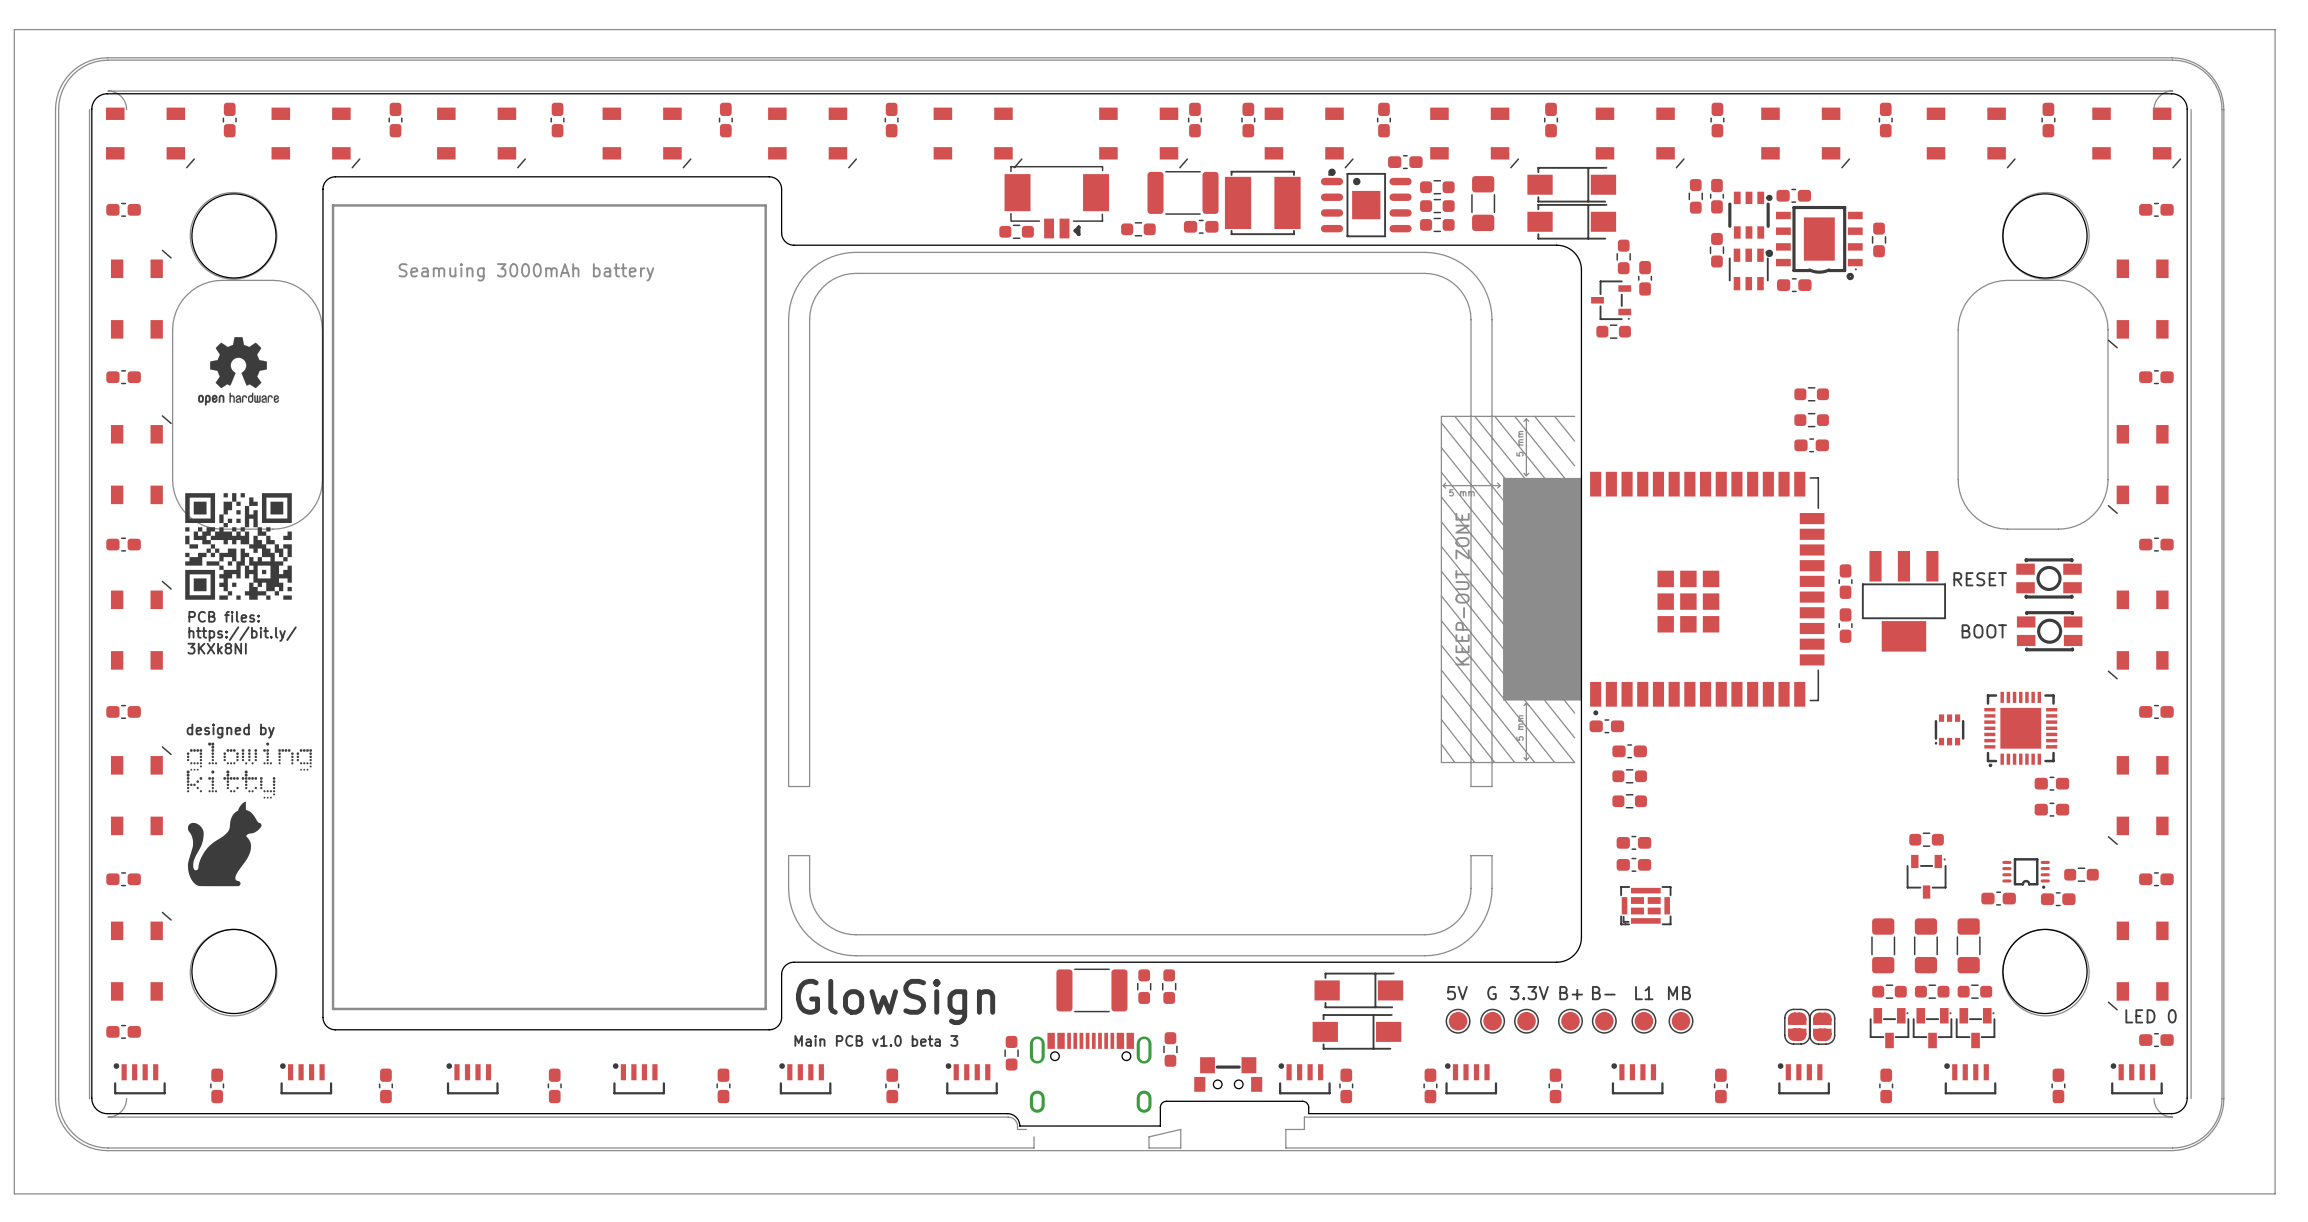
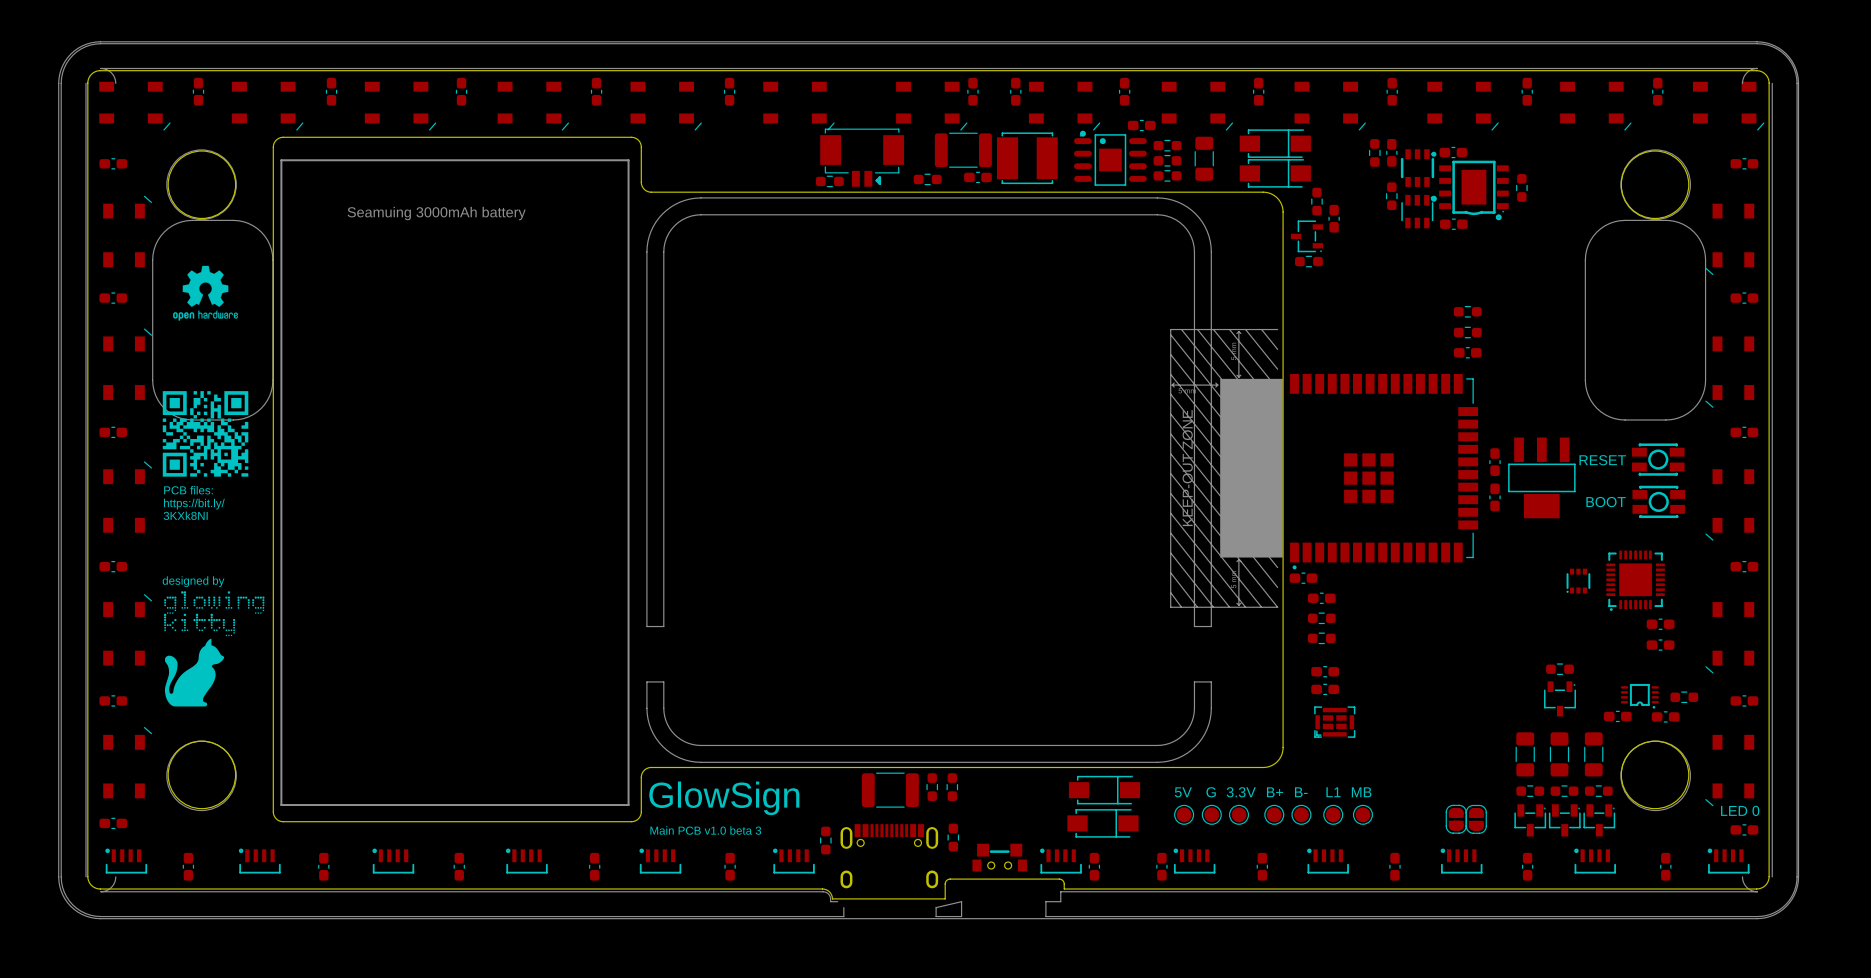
line: (14, 29) (2275, 29) (2275, 1193) (14, 1193) (14, 29) -> none

